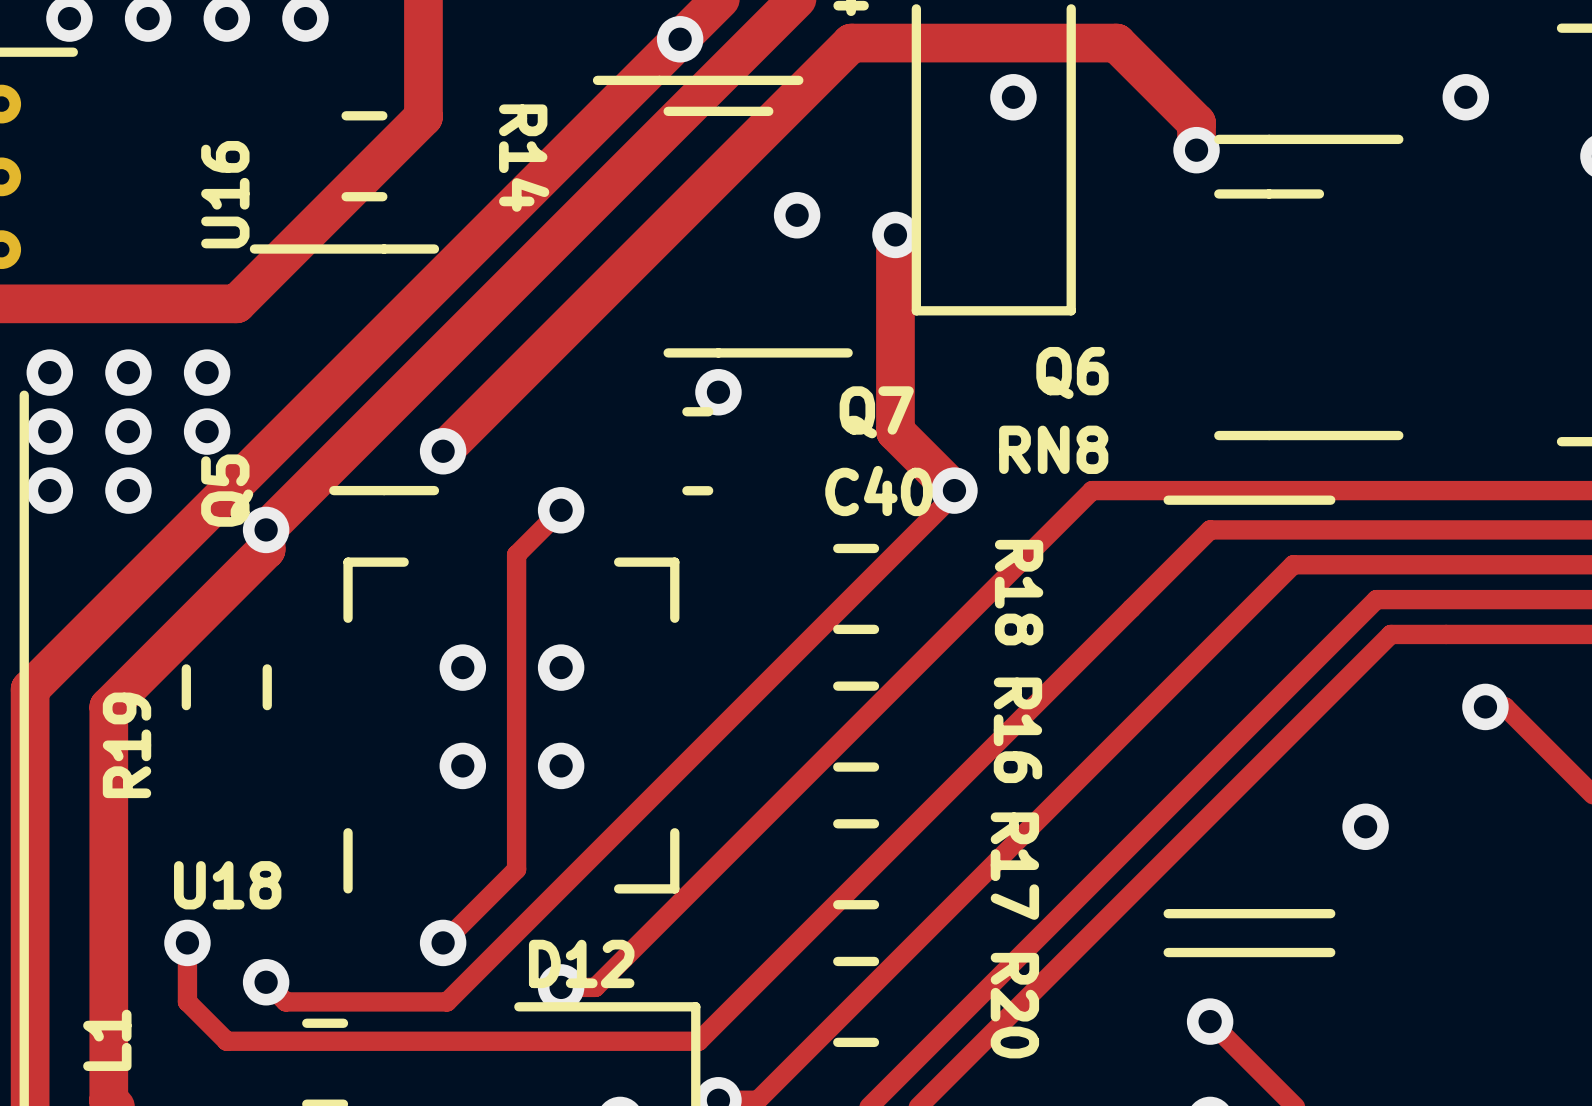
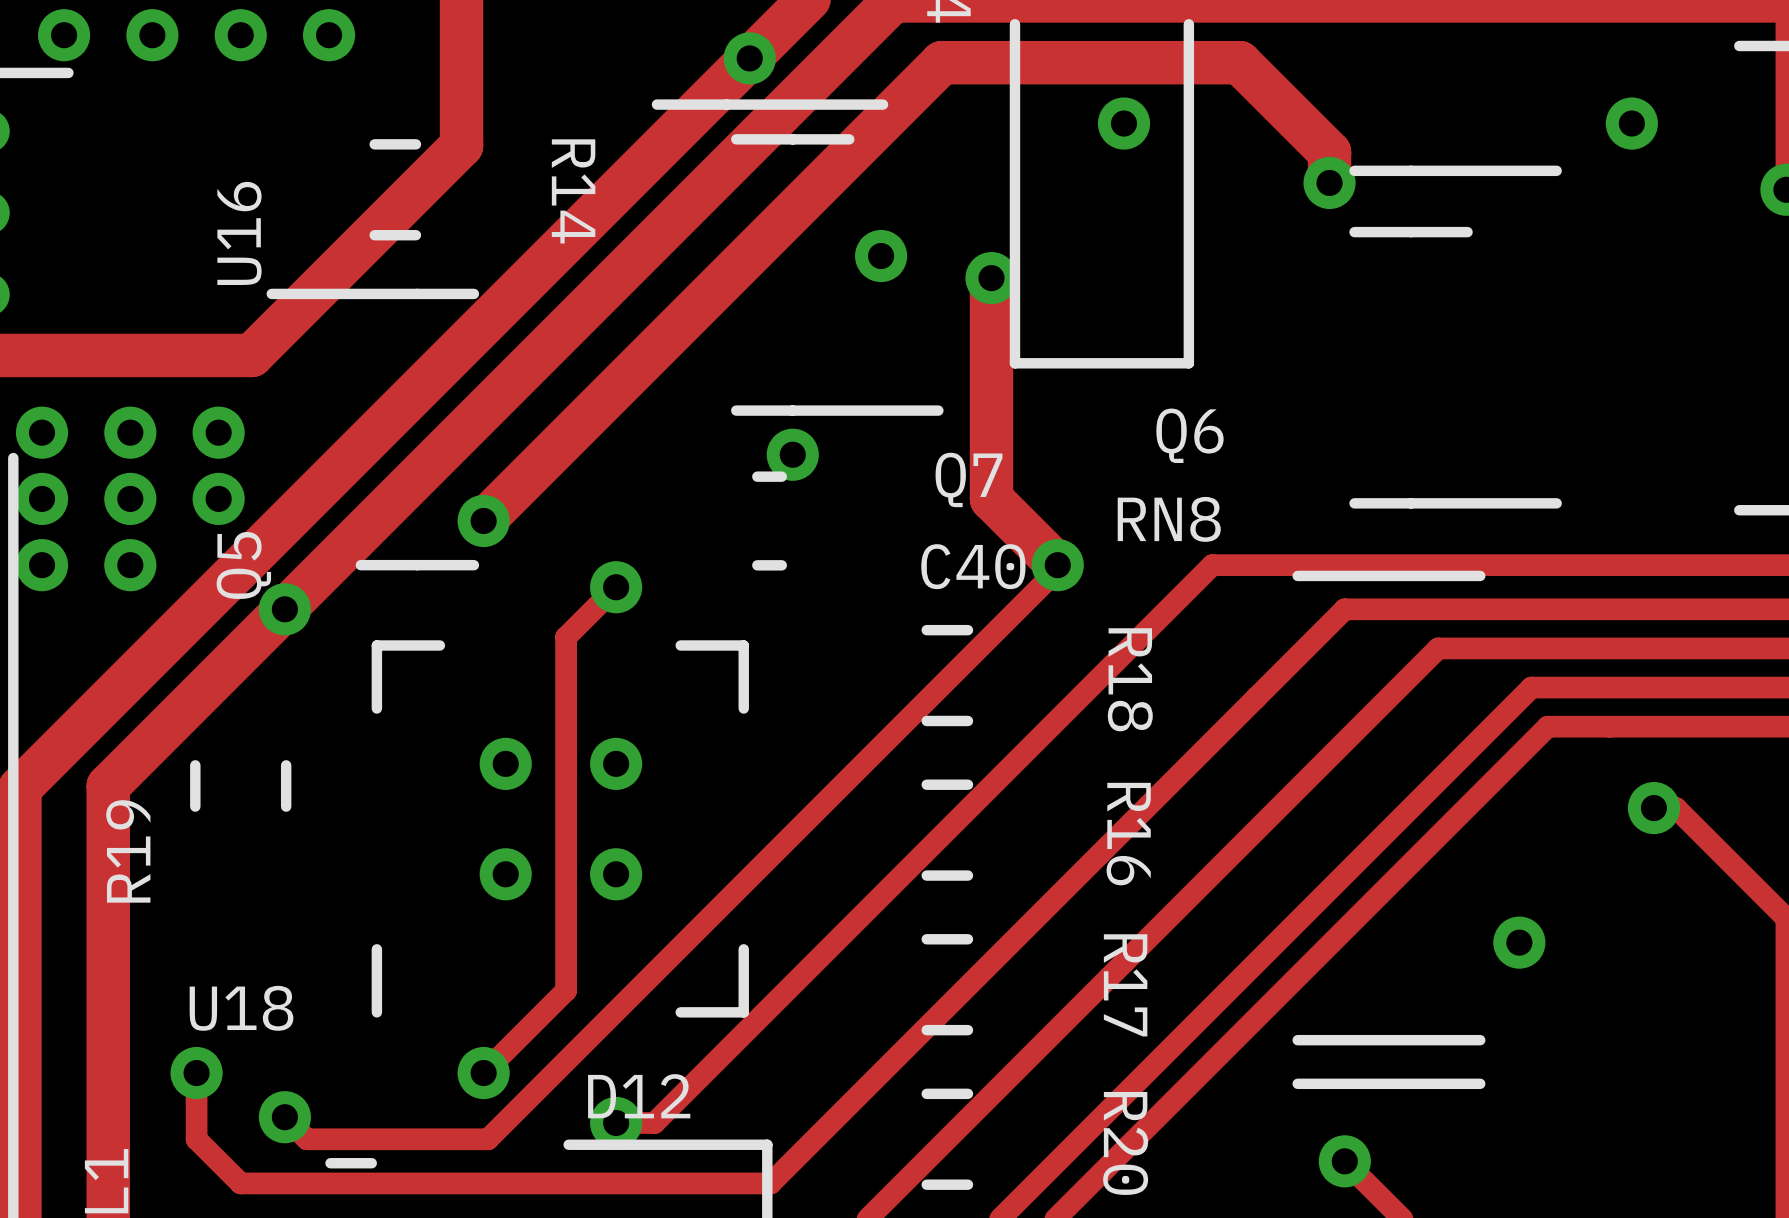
track: (266, 529) (266, 549) (108, 706) -> (284, 609) (108, 785) (108, 808)

